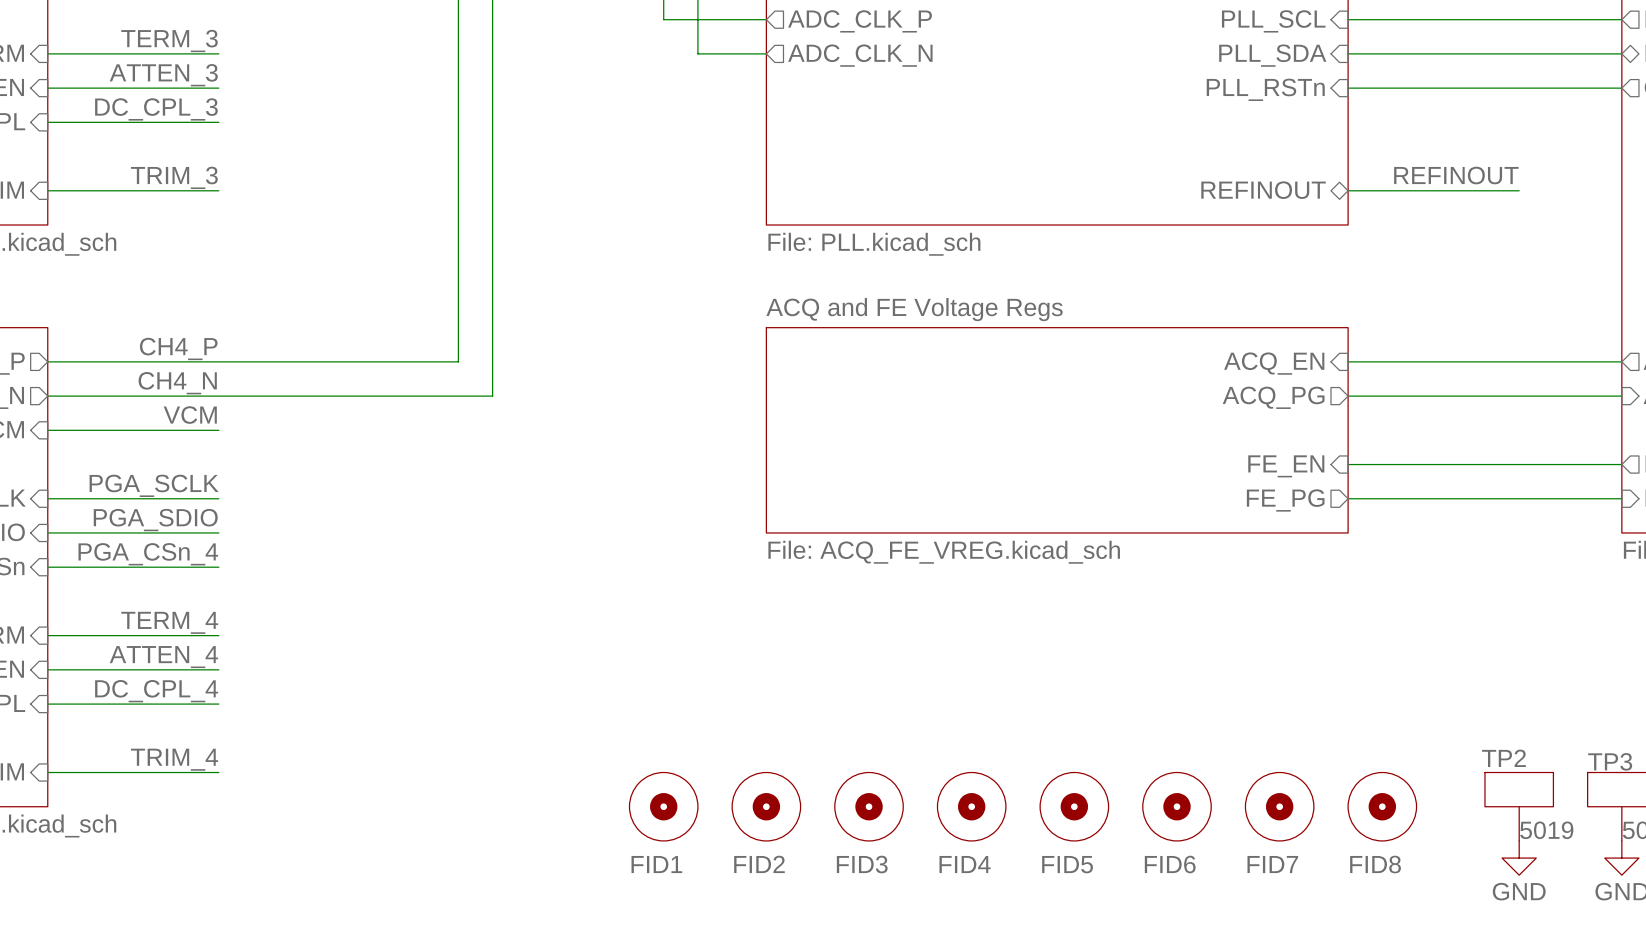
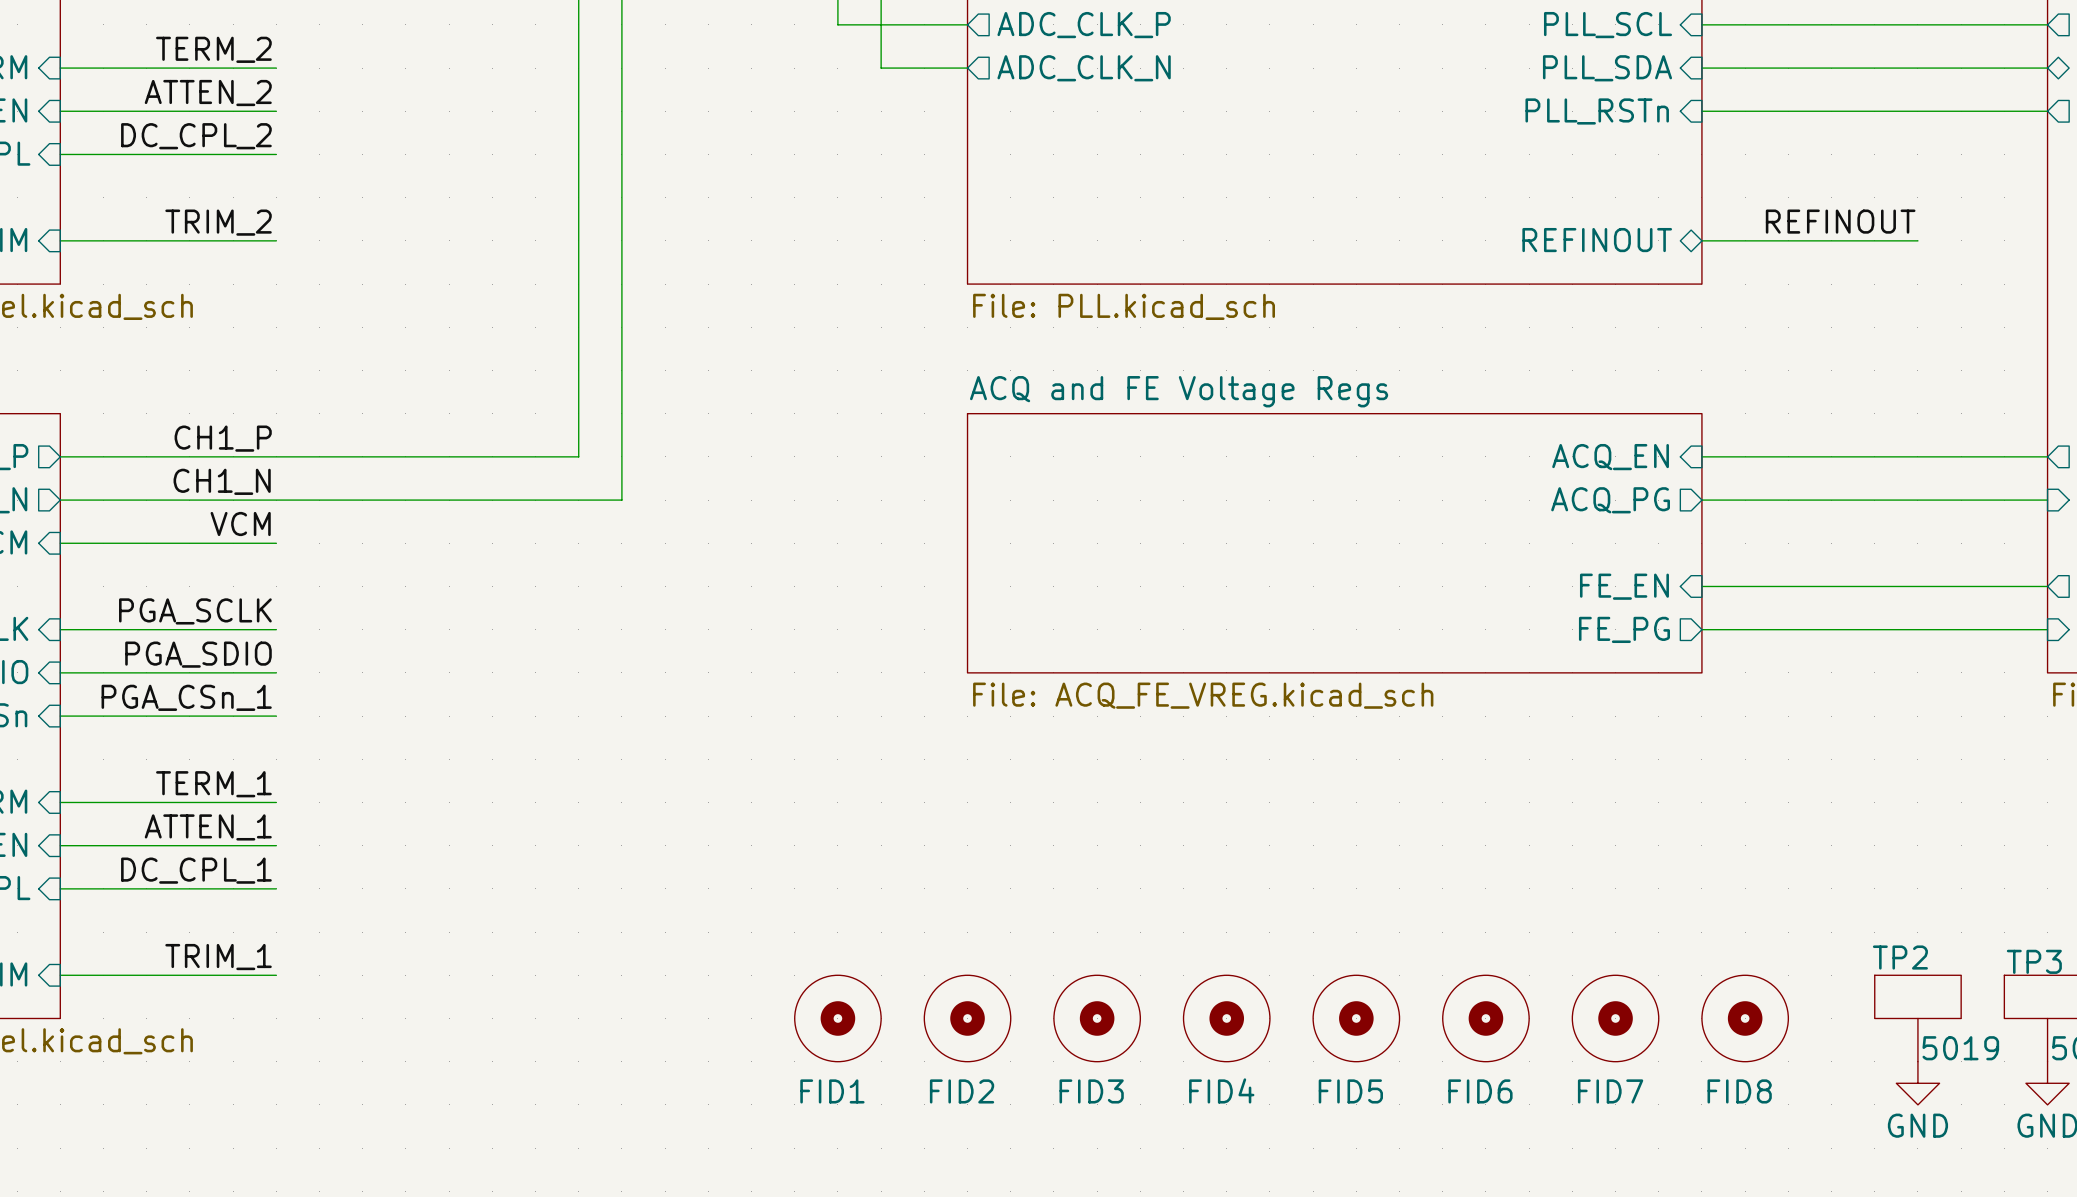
label: TERM_3 (169, 40) -> TERM_2 (213, 49)
label: ATTEN_3 (163, 75) -> ATTEN_2 (208, 93)
label: DC_CPL_3 (156, 109) -> DC_CPL_2 (196, 136)
label: TRIM_3 (174, 177) -> TRIM_2 (218, 222)
label: CH4_P (178, 348) -> CH1_P (223, 438)
label: CH4_N (177, 383) -> CH1_N (222, 481)
label: PGA_CSn_4 (148, 554) -> PGA_CSn_1 (186, 697)
label: TERM_4 (169, 622) -> TERM_1 (213, 784)
label: ATTEN_4 (163, 657) -> ATTEN_1 (208, 827)
label: DC_CPL_4 (156, 691) -> DC_CPL_1 (196, 870)
label: TRIM_4 (174, 759) -> TRIM_1 (218, 957)

